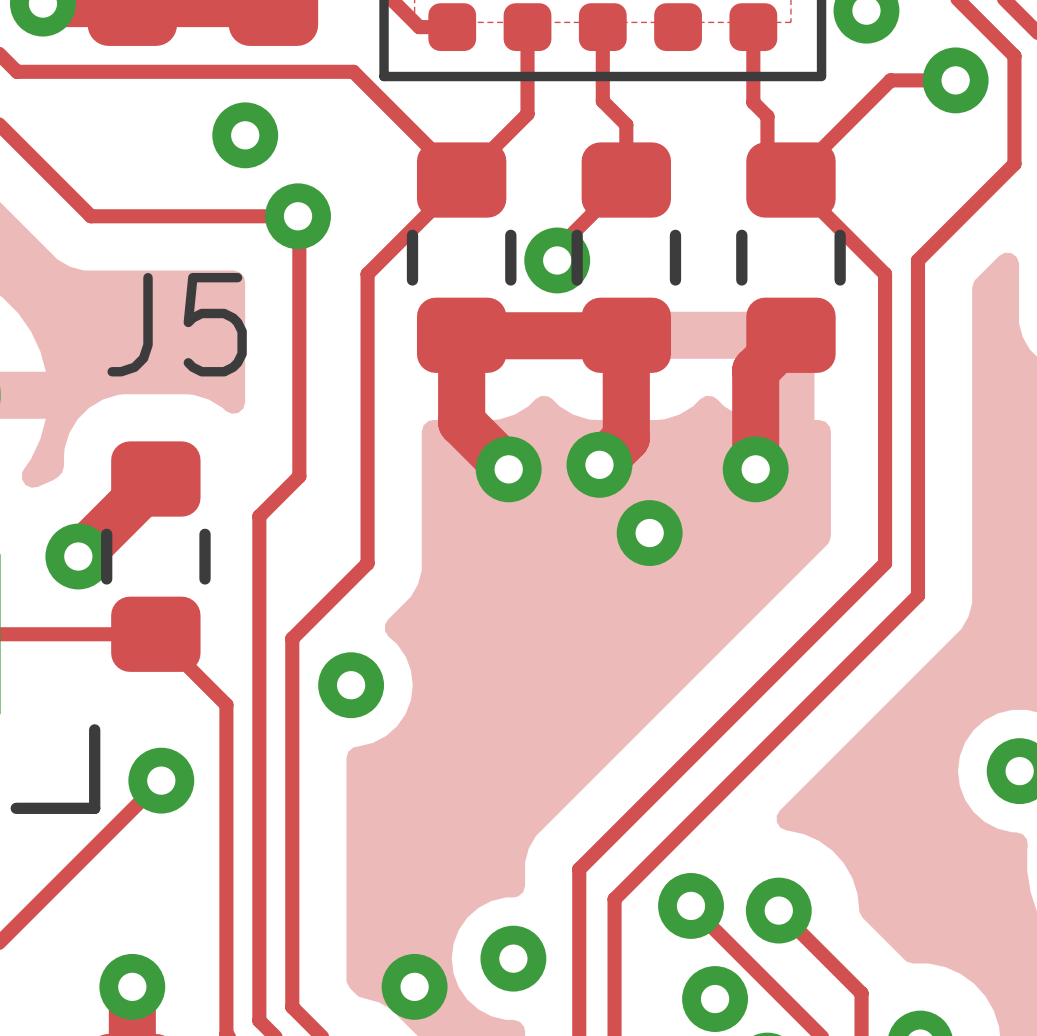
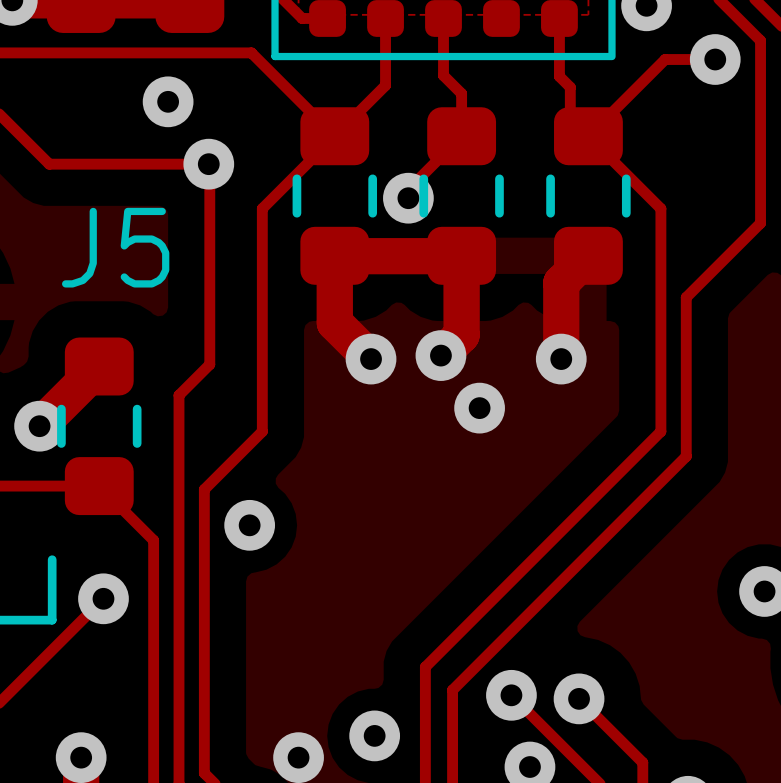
track: (1014, 164) (918, 260) (918, 389) -> (760, 123) (760, 223) (686, 297)

